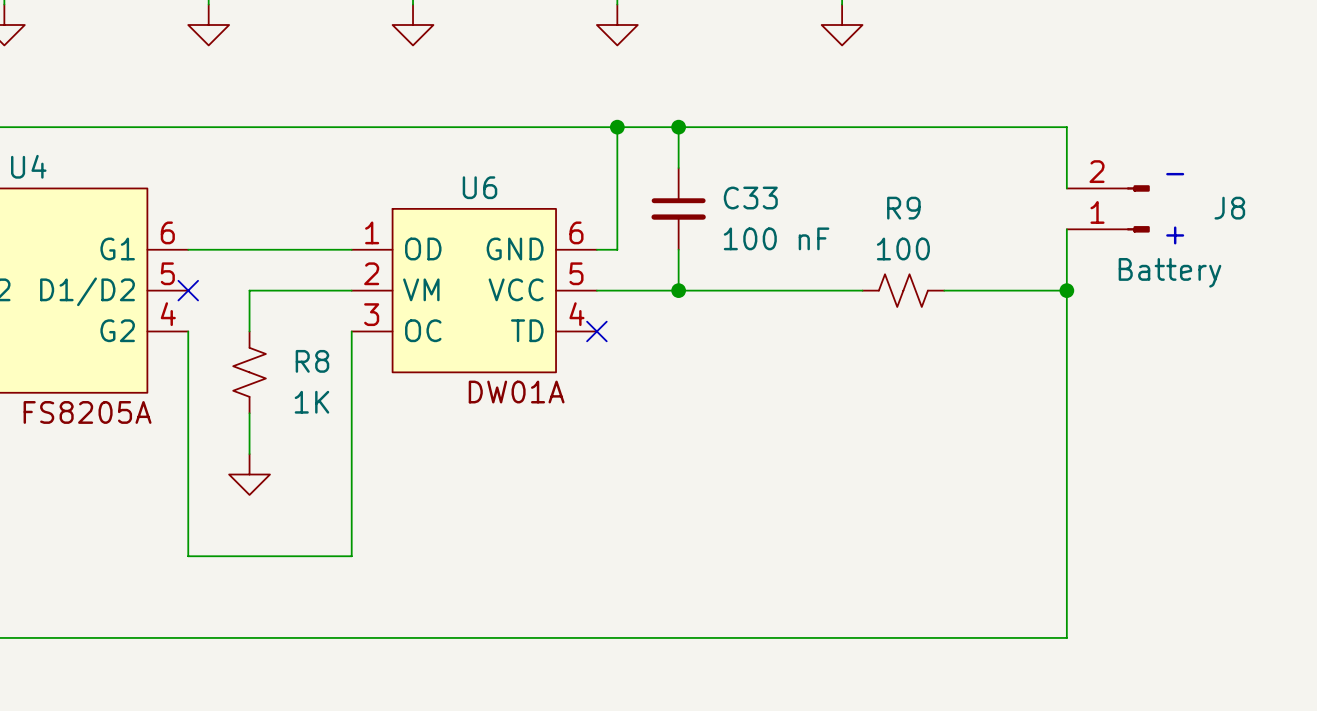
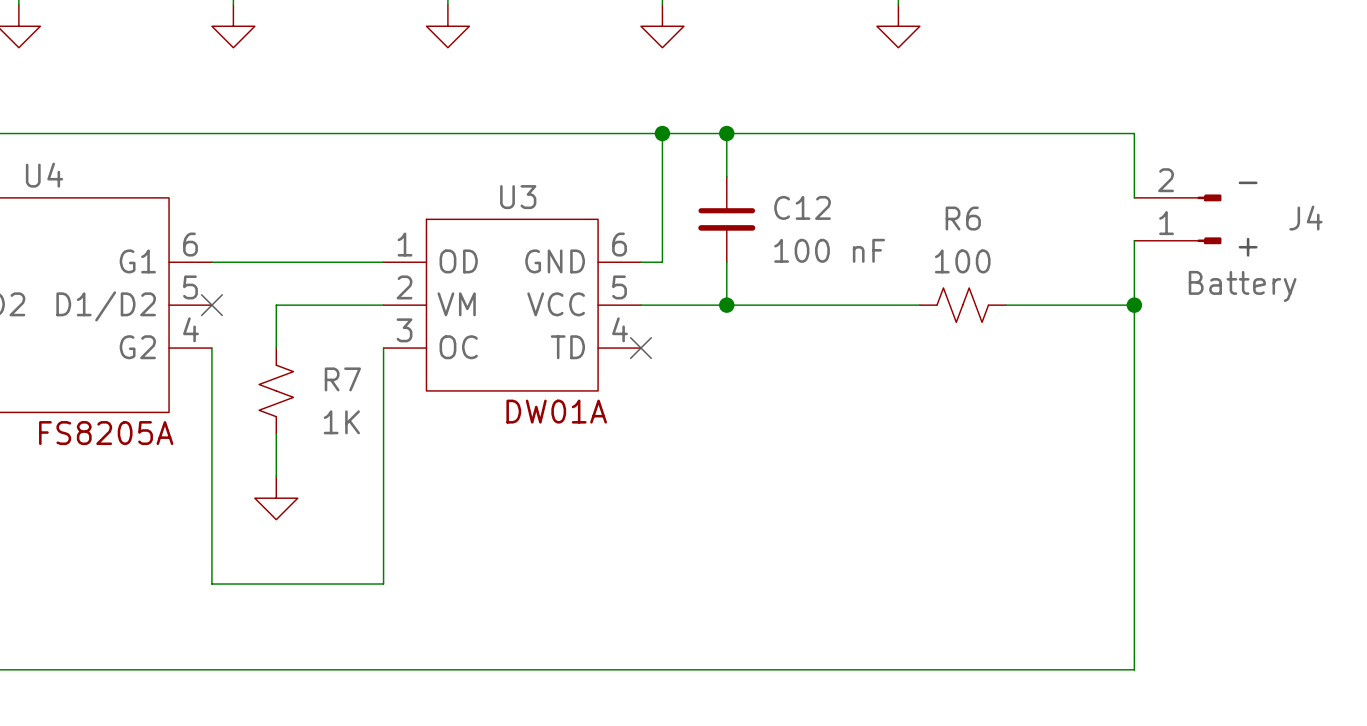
U6 name: U6 (479, 187) -> U3 (518, 197)
C33 name: C33 (750, 198) -> C12 (802, 207)
R9 name: R9 (903, 208) -> R6 (963, 218)
J8 name: J8 (1229, 208) -> J4 (1305, 218)
R8 name: R8 (312, 361) -> R7 (342, 379)

